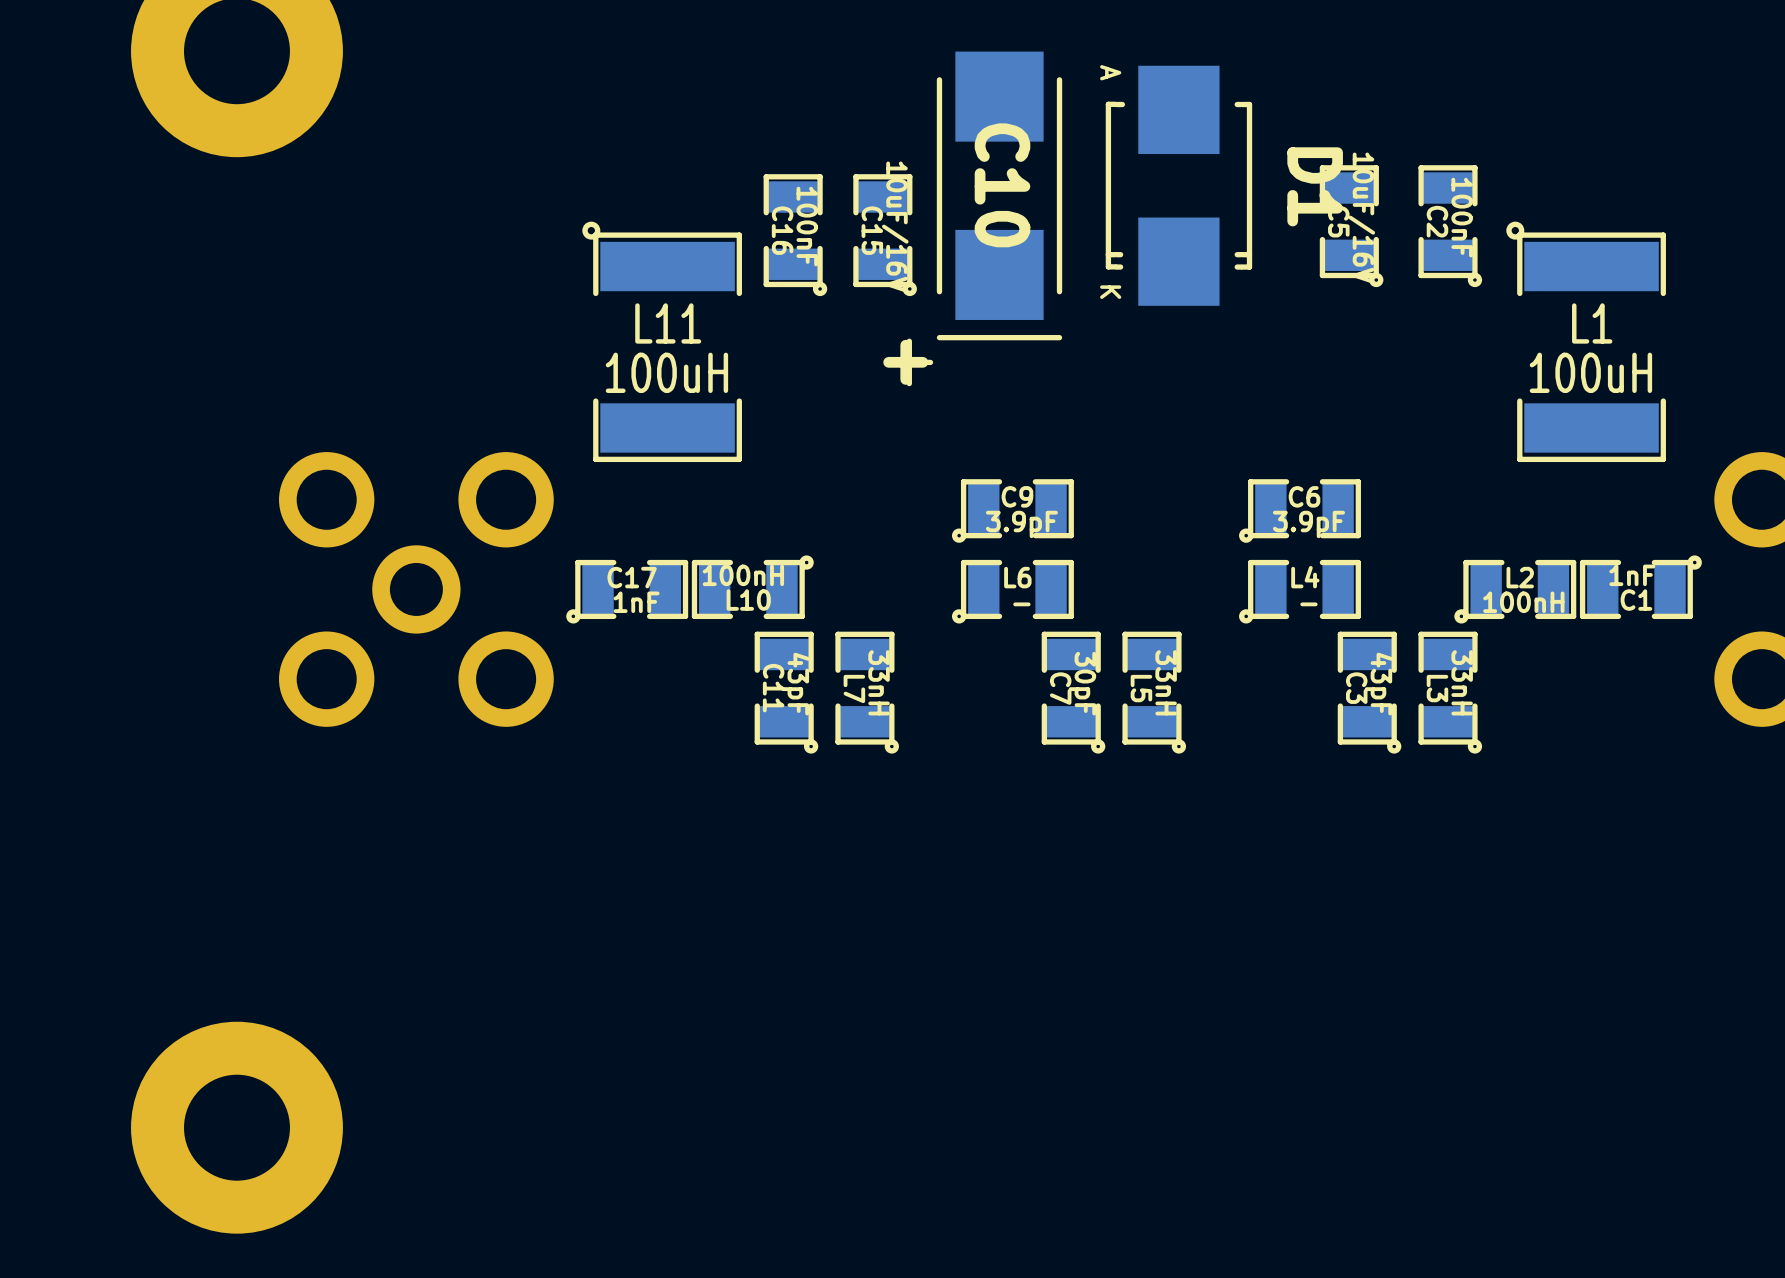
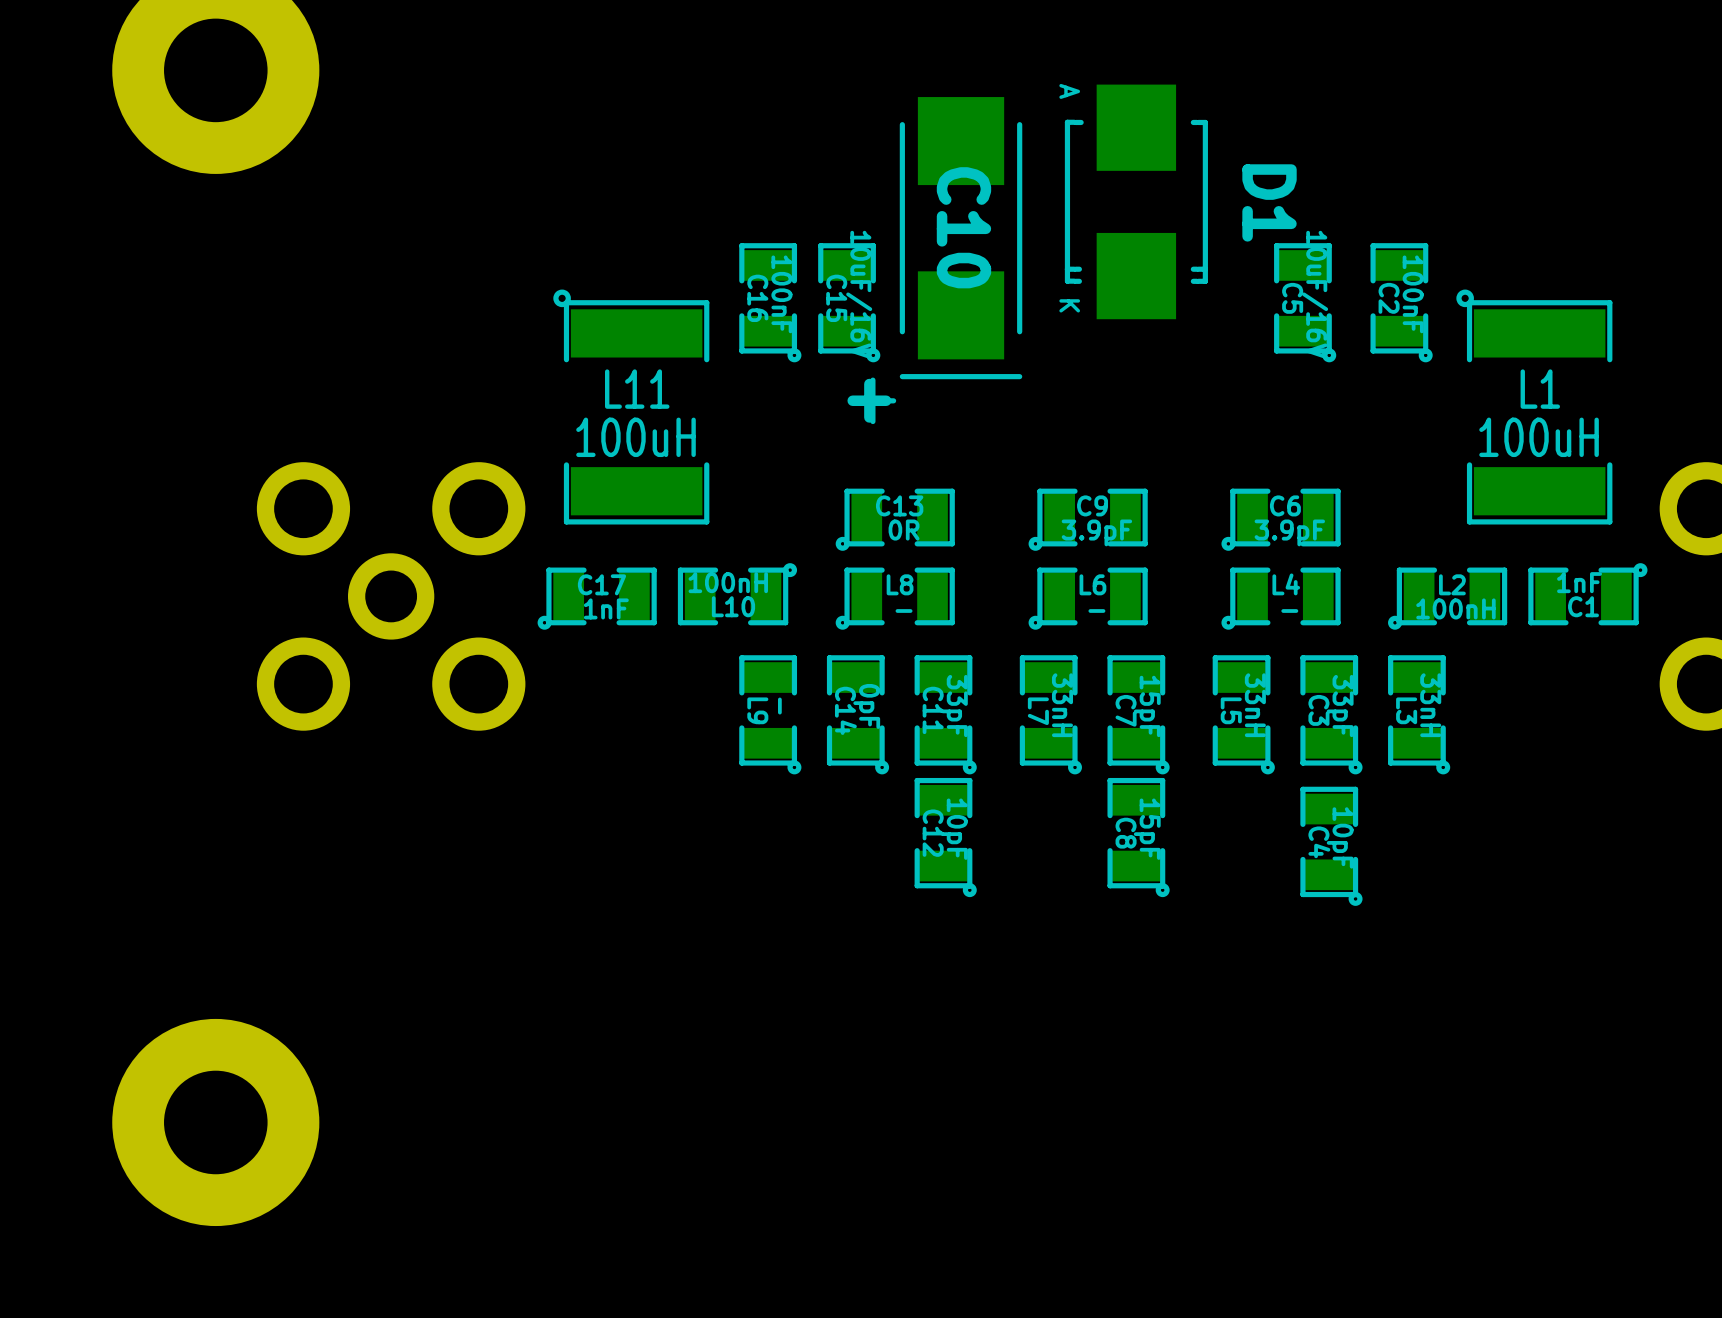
C10 position: (975, 218) -> (937, 260)
C5 position: (1351, 226) -> (1305, 302)
C2 position: (1450, 226) -> (1401, 302)
C16 position: (795, 235) -> (770, 302)
C15 position: (885, 235) -> (849, 302)
L11 position: (662, 341) -> (631, 407)
L1 position: (1586, 341) -> (1534, 407)
C13: none -> 0R (895, 519)
C9 position: (1012, 510) -> (1088, 519)
C6 position: (1300, 510) -> (1281, 519)
L10 position: (752, 587) -> (737, 594)
L8: none -> - (895, 598)
L6 position: (1012, 591) -> (1088, 598)
L4 position: (1300, 591) -> (1281, 598)
L2 position: (1515, 591) -> (1447, 598)
C7 value: 30pF (1082, 683) -> 15pF (1147, 706)
C11 value: 43pF (795, 684) -> 33pF (954, 706)
C3 value: 43pF (1378, 684) -> 33pF (1340, 706)
C11 position: (786, 692) -> (945, 714)
L7 position: (867, 692) -> (1050, 714)
C7 position: (1073, 692) -> (1138, 714)
L5 position: (1154, 692) -> (1243, 714)
C3 position: (1369, 692) -> (1331, 714)
L3 position: (1450, 692) -> (1419, 714)
L9: none -> - (770, 714)
C14: none -> 0pF (858, 714)
C12: none -> 10pF (945, 837)
C8: none -> 15pF (1138, 837)
C4: none -> 10pF (1331, 846)

